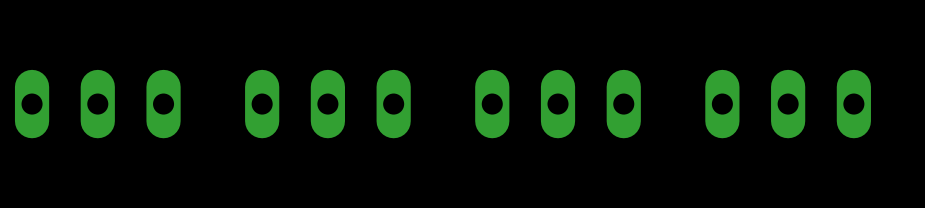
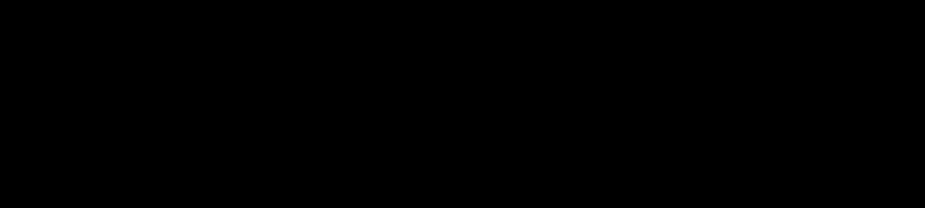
part: (97, 104) -> none
part: (327, 104) -> none
part: (558, 104) -> none
part: (788, 104) -> none

